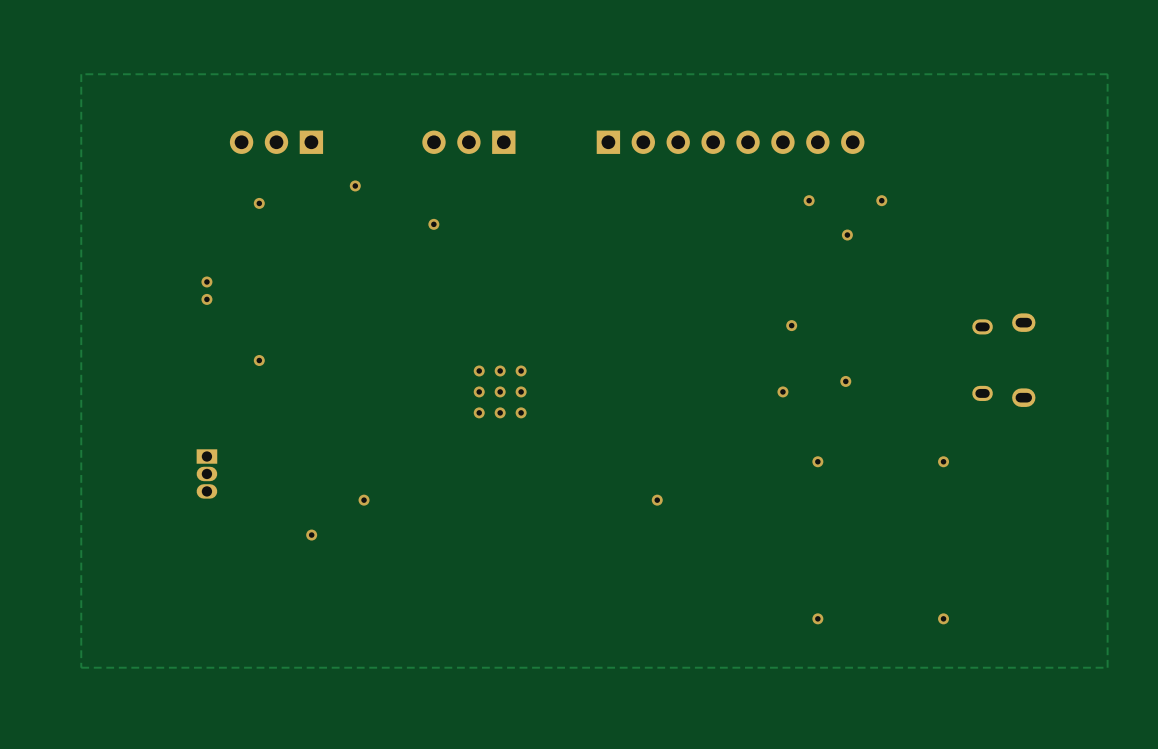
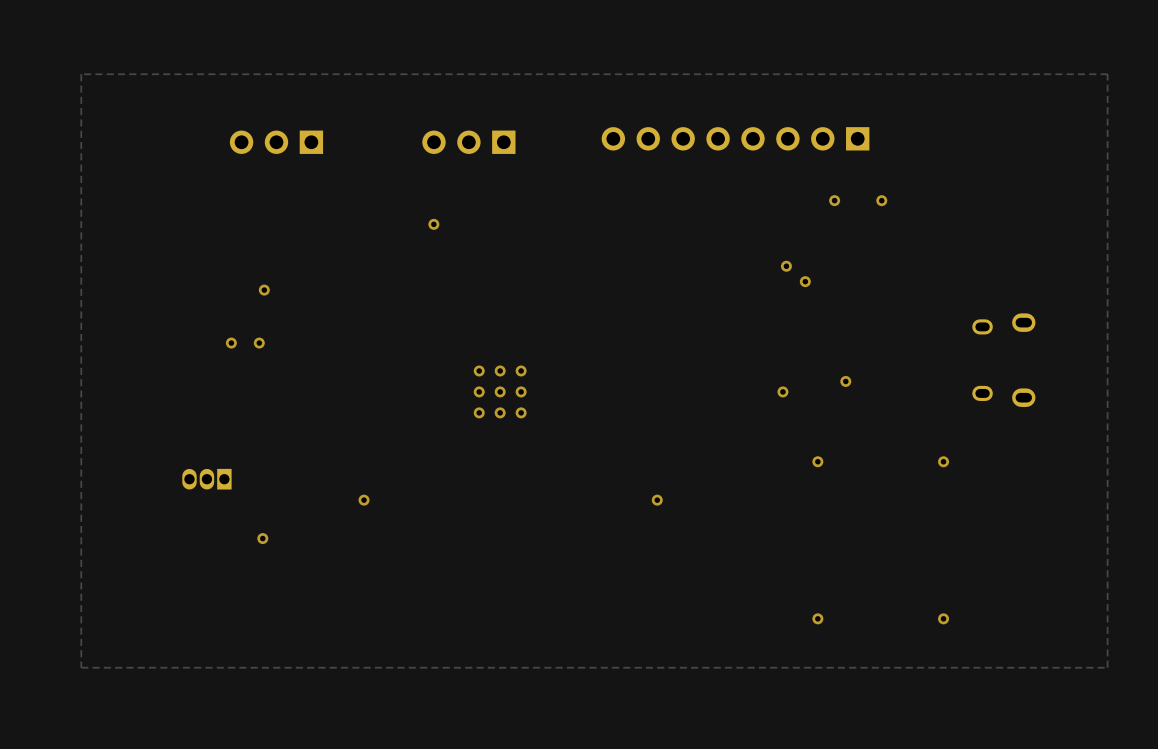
part rotation: 0° (730, 142) -> 180° (735, 138)
via: (355, 185) -> none
via: (809, 200) -> none
via: none -> (834, 200)
via: (259, 203) -> none
via: (847, 235) -> none
via: none -> (786, 266)
via: (206, 281) -> none
via: none -> (805, 281)
via: none -> (264, 290)
via: (206, 299) -> none
via: (791, 325) -> none
via: none -> (231, 343)
via: none -> (259, 343)
via: (259, 360) -> none
part rotation: 0° (206, 473) -> 90° clockwise (206, 479)
via position: (311, 535) -> (262, 538)

